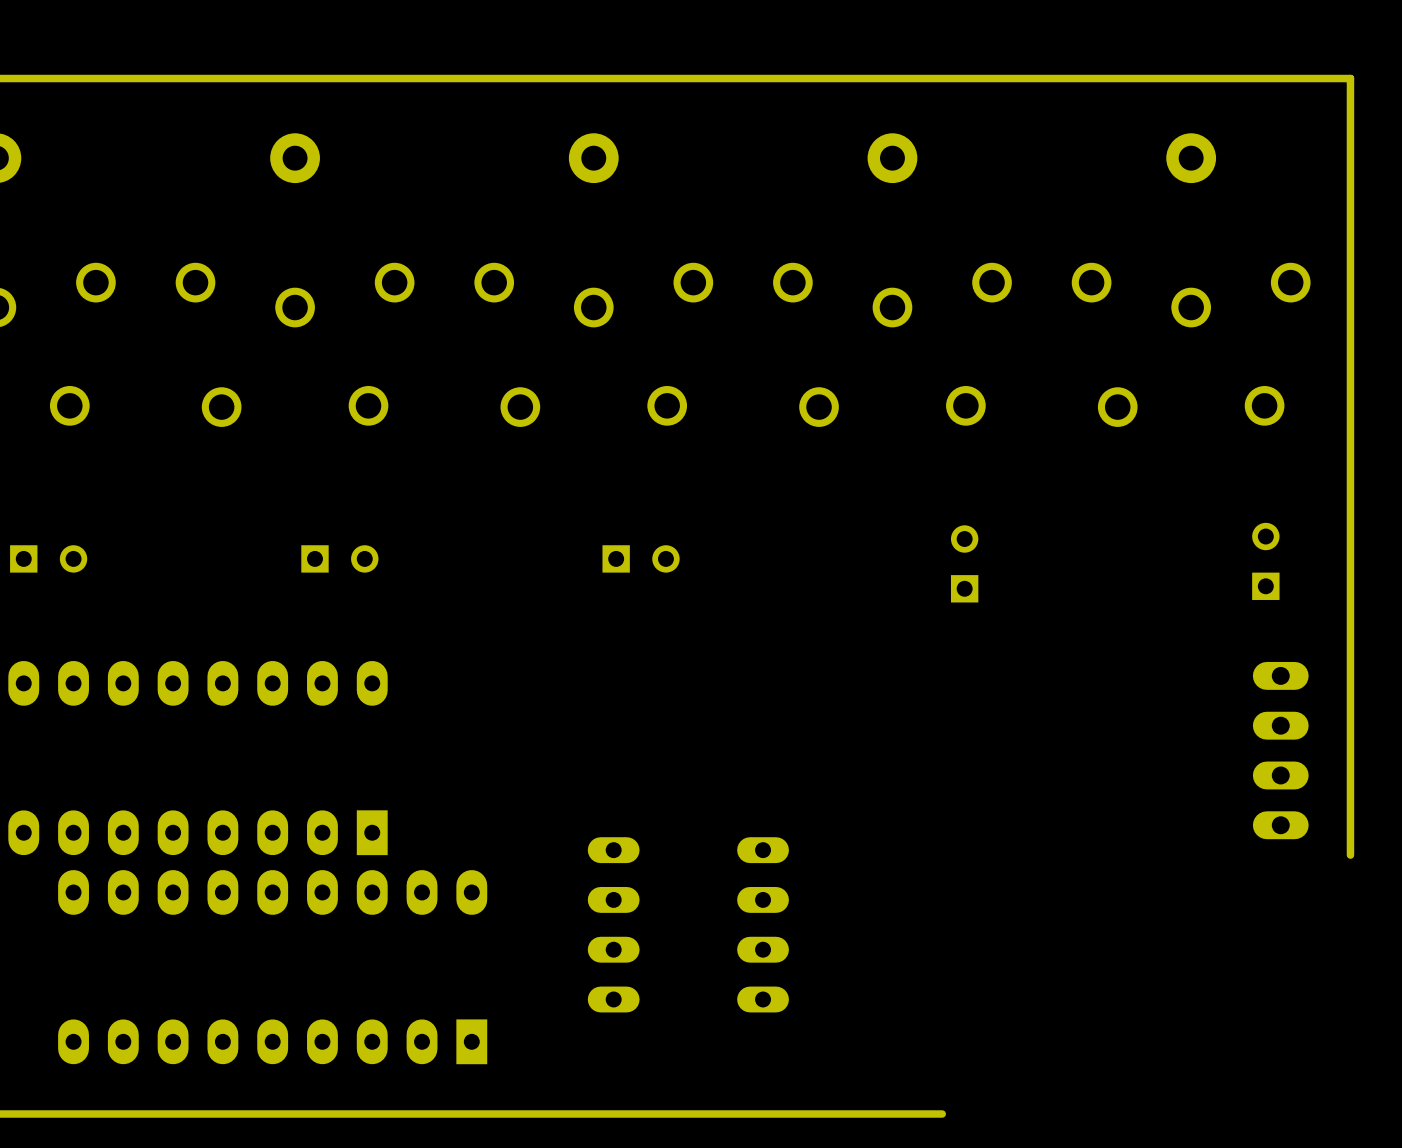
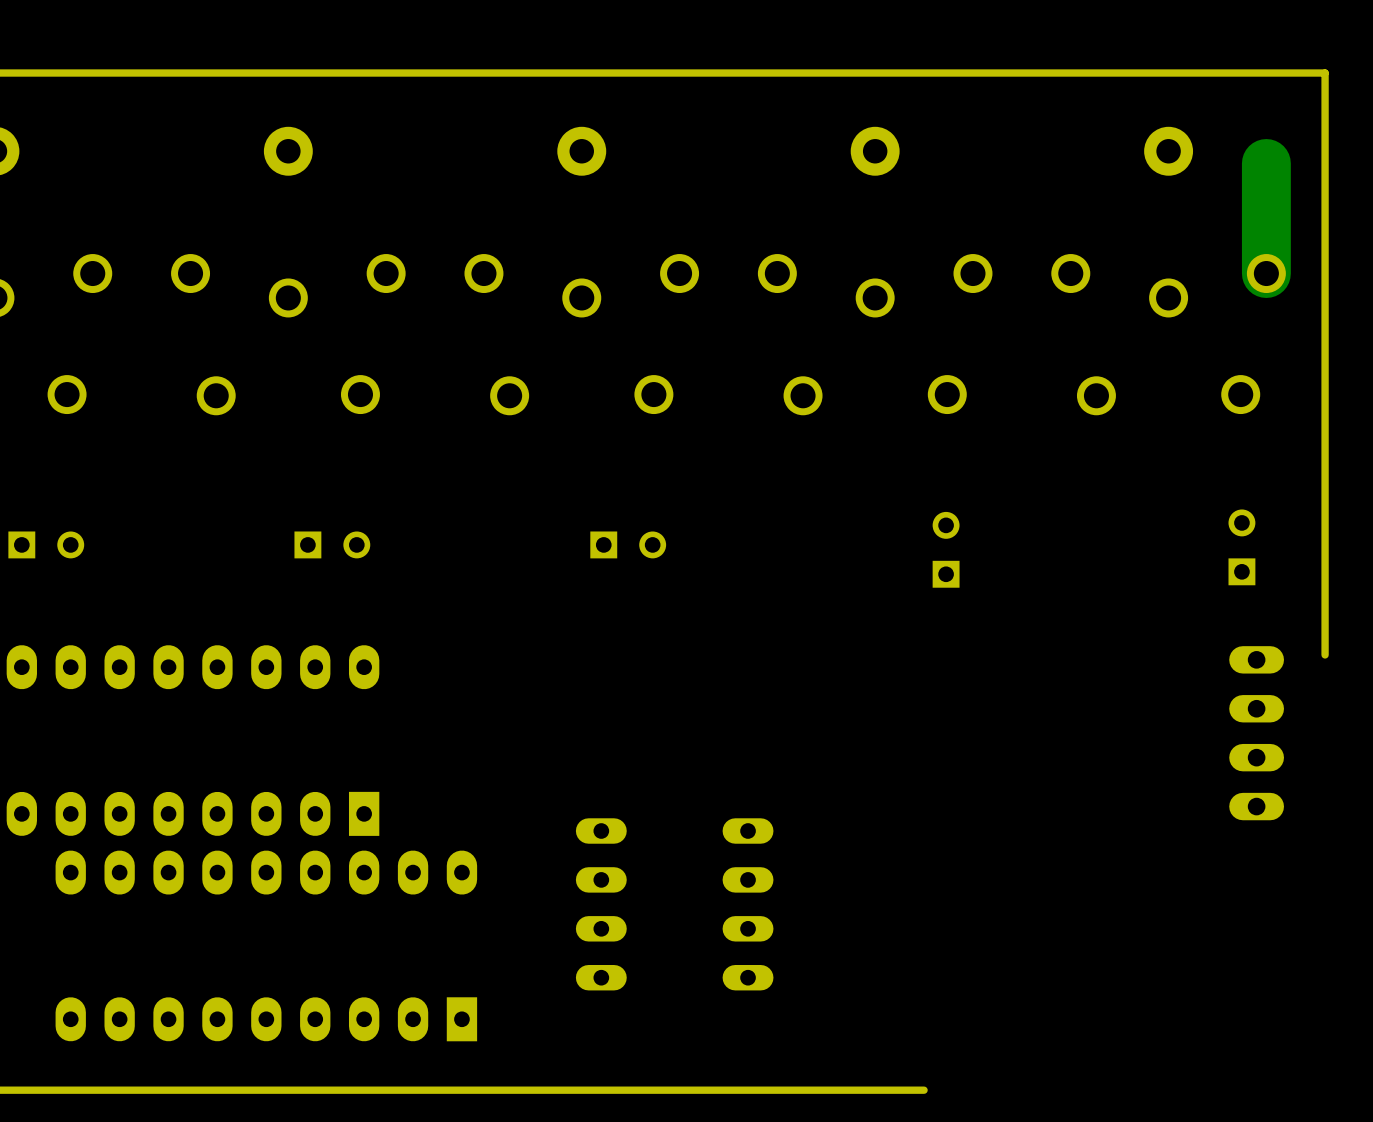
track: none -> (1266, 163) (1266, 273)
board edge: (1350, 670) (1350, 855) -> none

